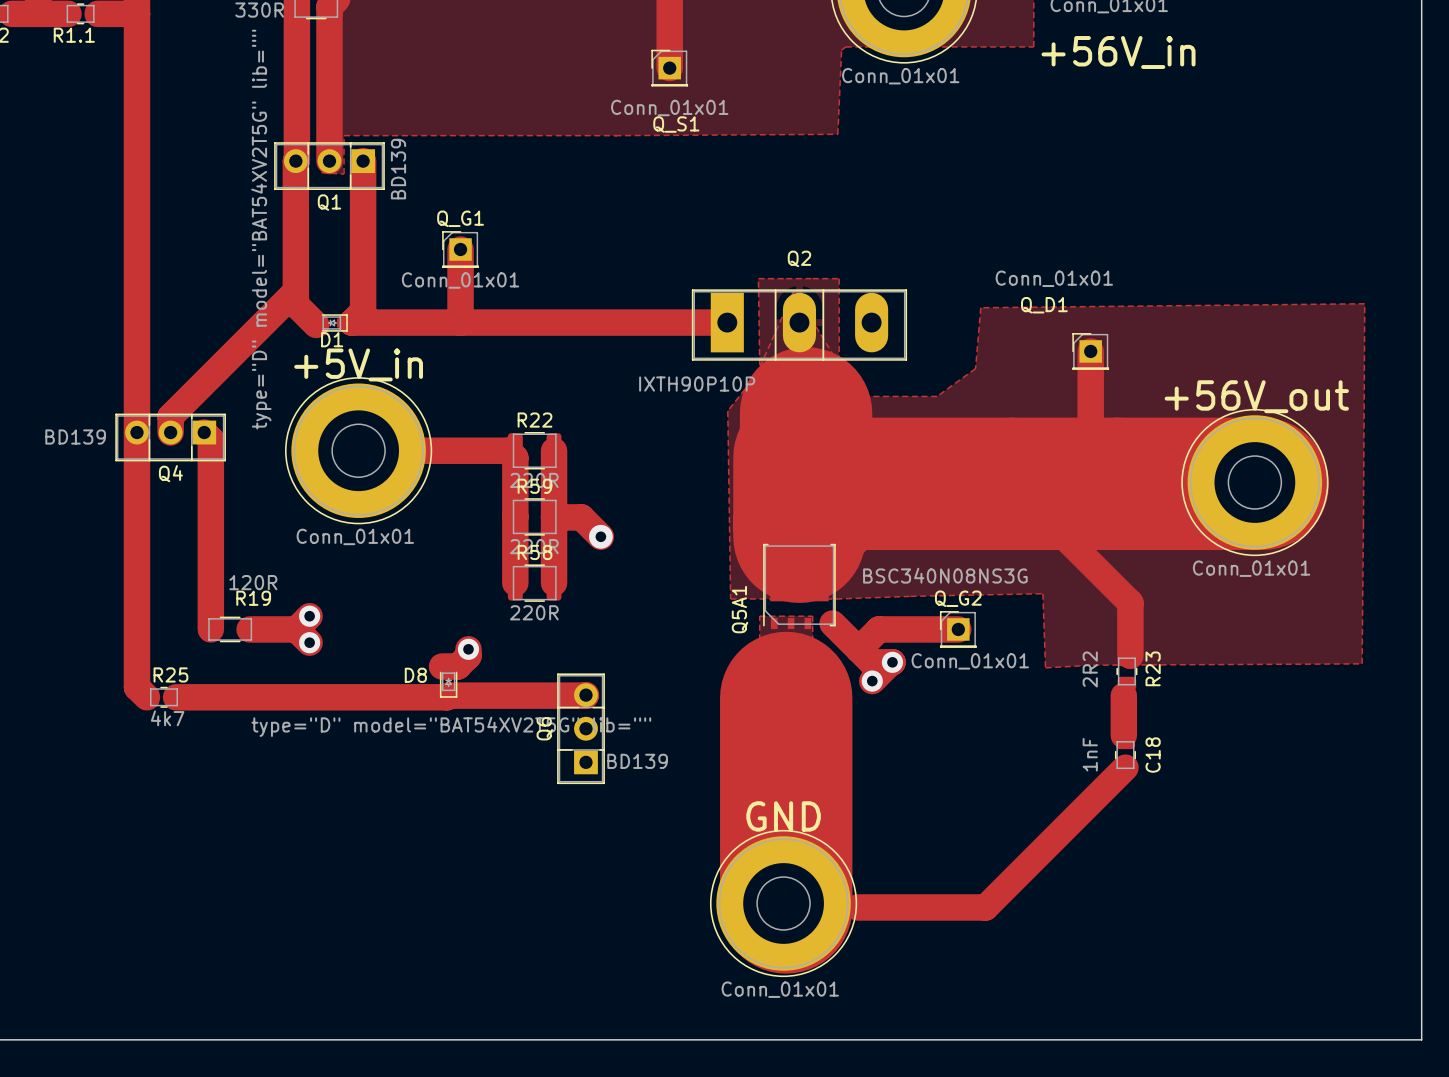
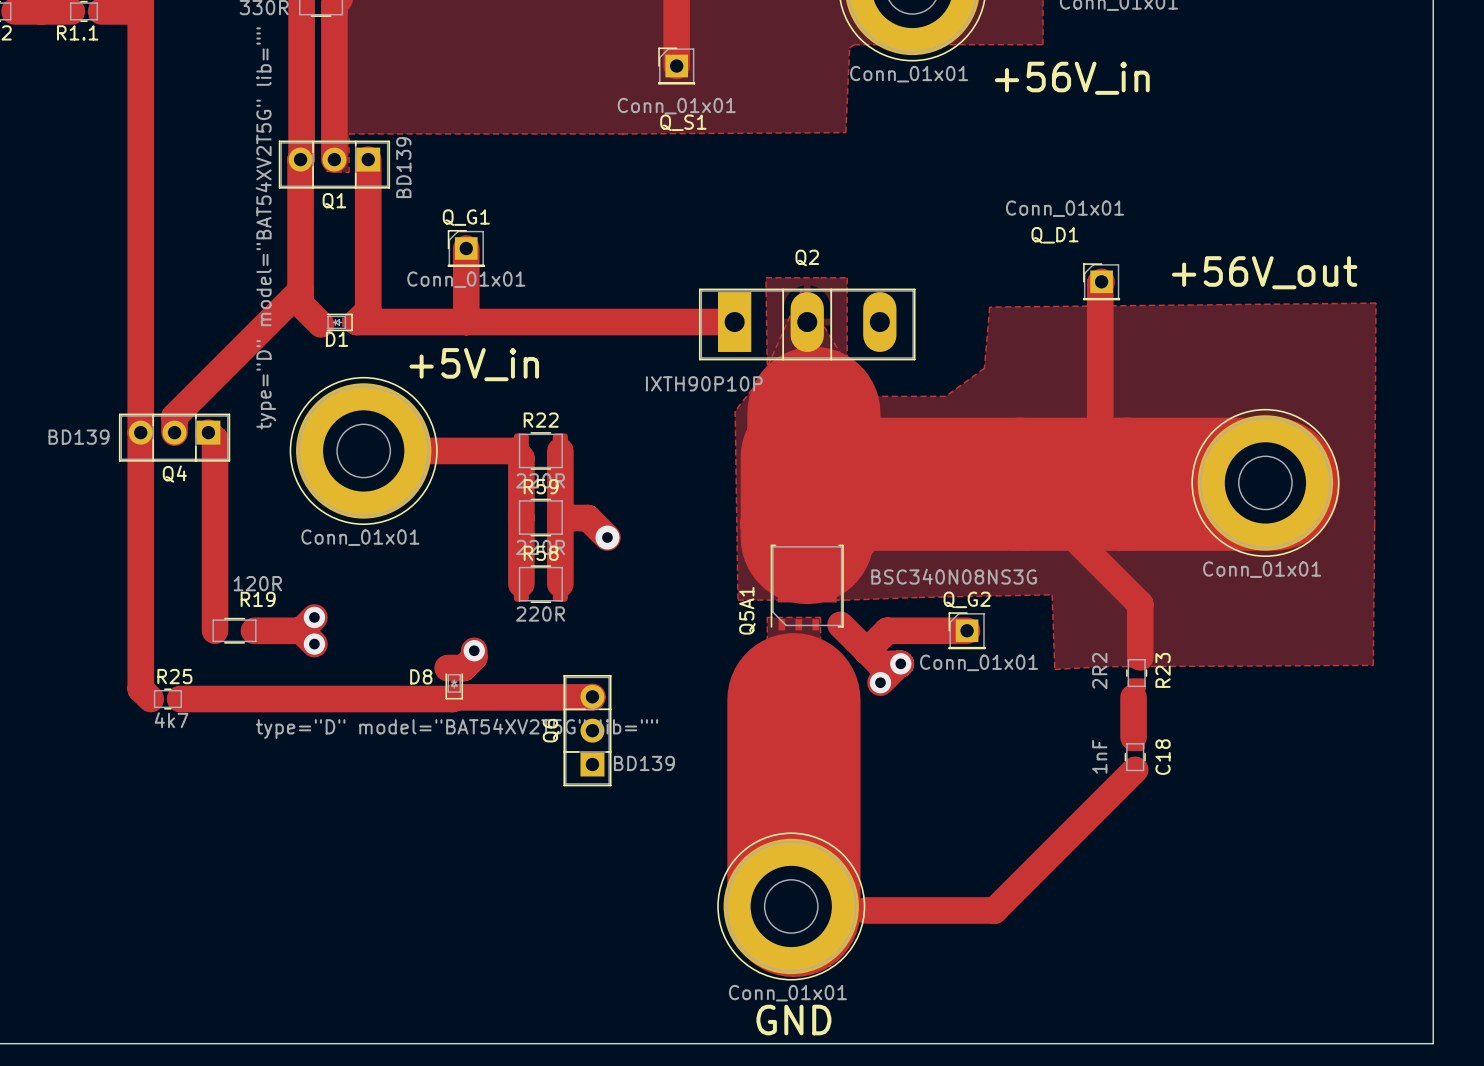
+56V_in name position: +56V_in (1118, 52) -> +56V_in (1072, 78)
track: none -> (1101, 281) (1100, 351)
Q_D1 position: (1090, 351) -> (1101, 281)
+5V_in name position: +5V_in (358, 364) -> +5V_in (474, 364)
+56V_out name position: +56V_out (1256, 396) -> +56V_out (1264, 272)
GND name position: GND (783, 816) -> GND (793, 1020)

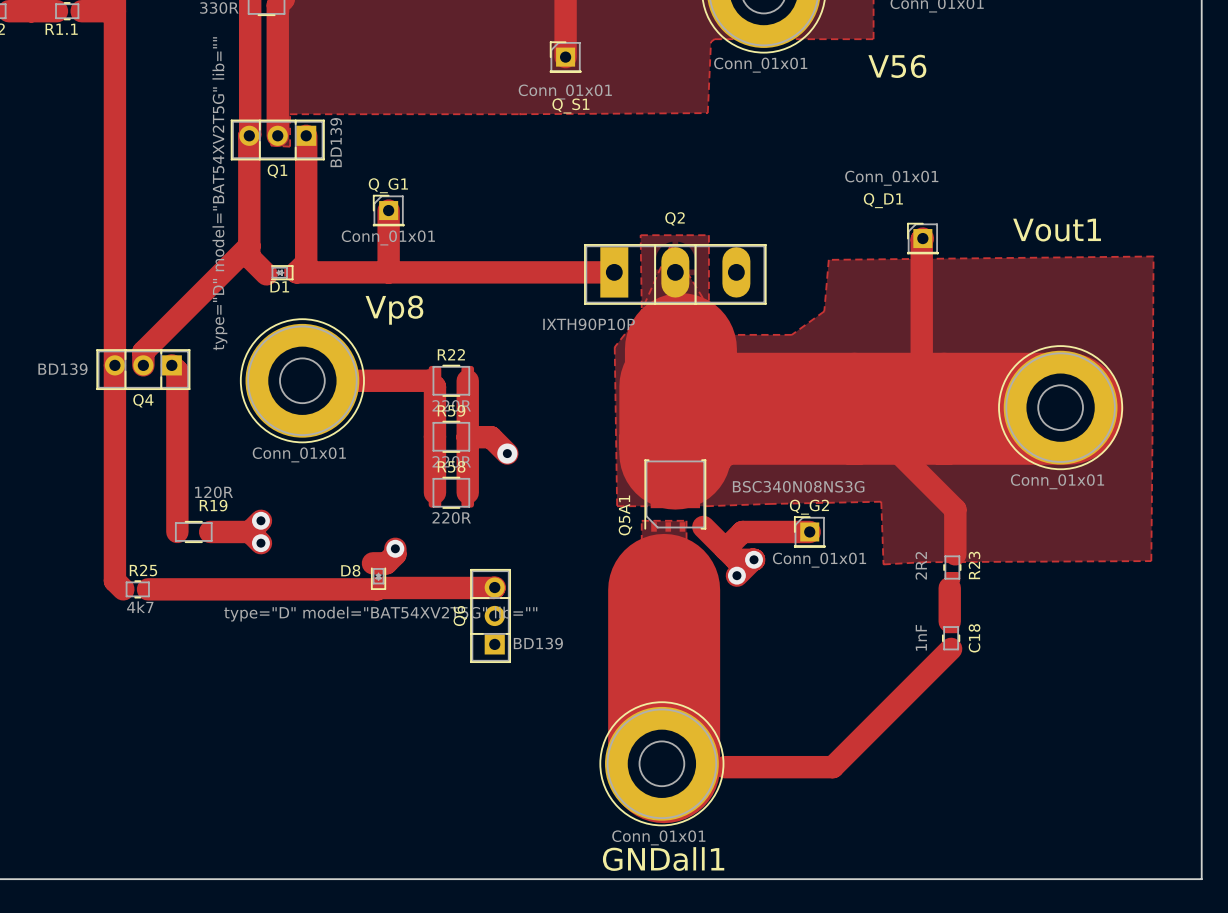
+56V_in name: +56V_in (1072, 78) -> V56 (897, 66)
+56V_out name: +56V_out (1264, 272) -> Vout1 (1057, 230)
+5V_in name: +5V_in (474, 364) -> Vp8 (394, 310)
GND name: GND (793, 1020) -> GNDall1 (663, 859)

